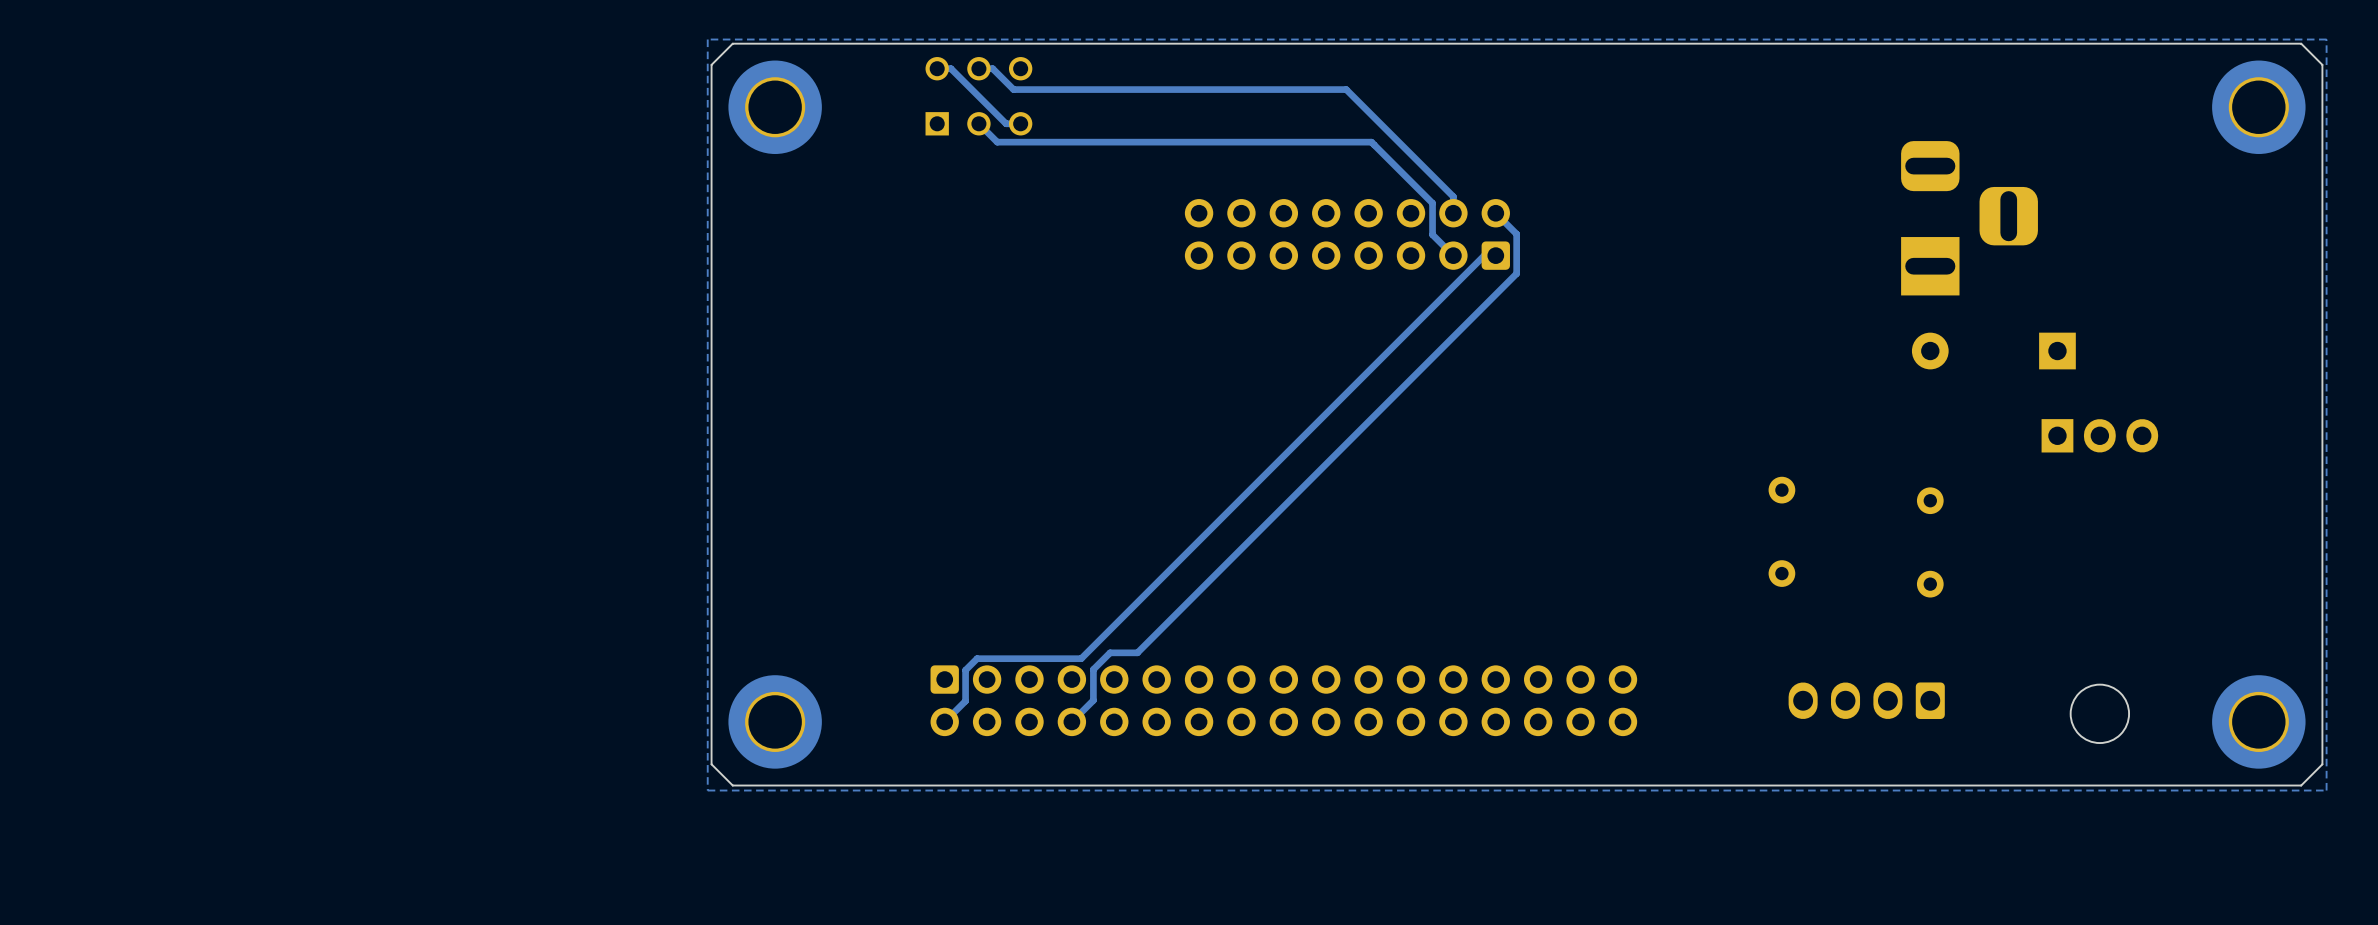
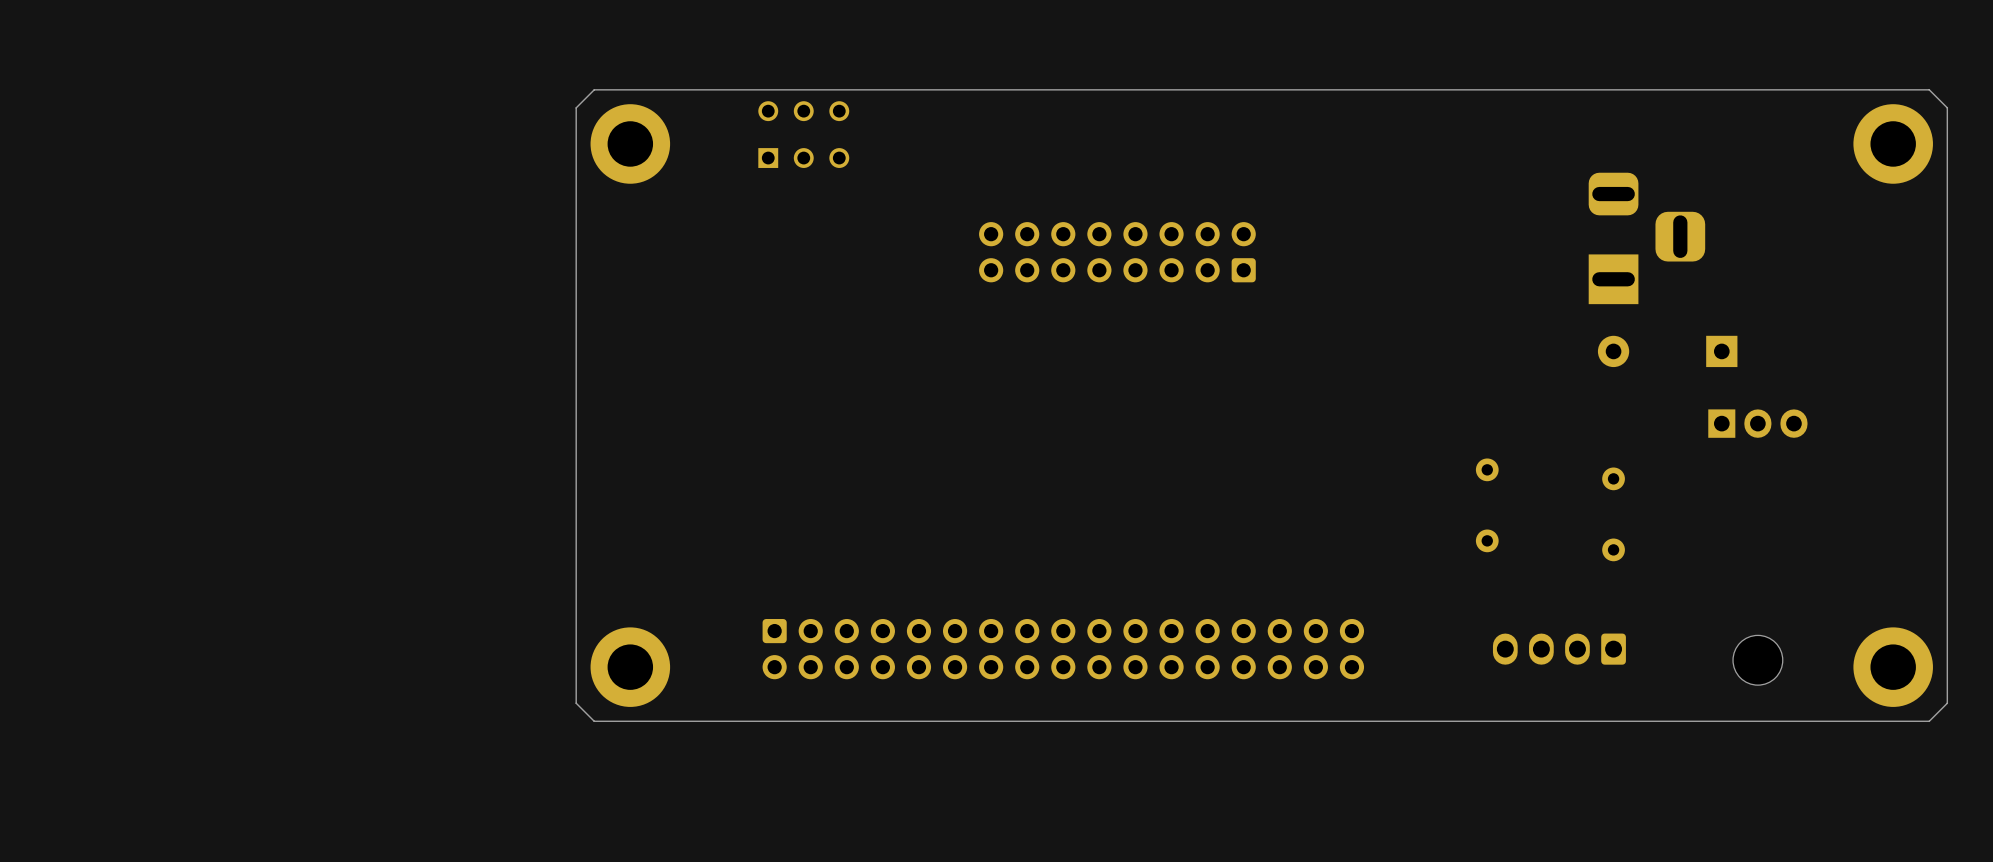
zone outline: (2326, 39) (2326, 790) (707, 790) (707, 39) (2326, 39) -> none
track: (937, 68) (951, 68) (1006, 123) (1021, 122) -> none
track: (978, 68) (992, 68) (1013, 89) (1346, 89) (1453, 196) (1453, 213) -> none
track: (978, 122) (997, 142) (1371, 142) (1432, 203) (1432, 234) (1453, 255) -> none
track: (1495, 213) (1516, 234) (1516, 273) (1137, 652) (1110, 652) (1093, 669) (1093, 700) (1071, 721) -> none
track: (1495, 255) (1484, 255) (1081, 658) (977, 658) (965, 670) (965, 701) (944, 721) -> none

